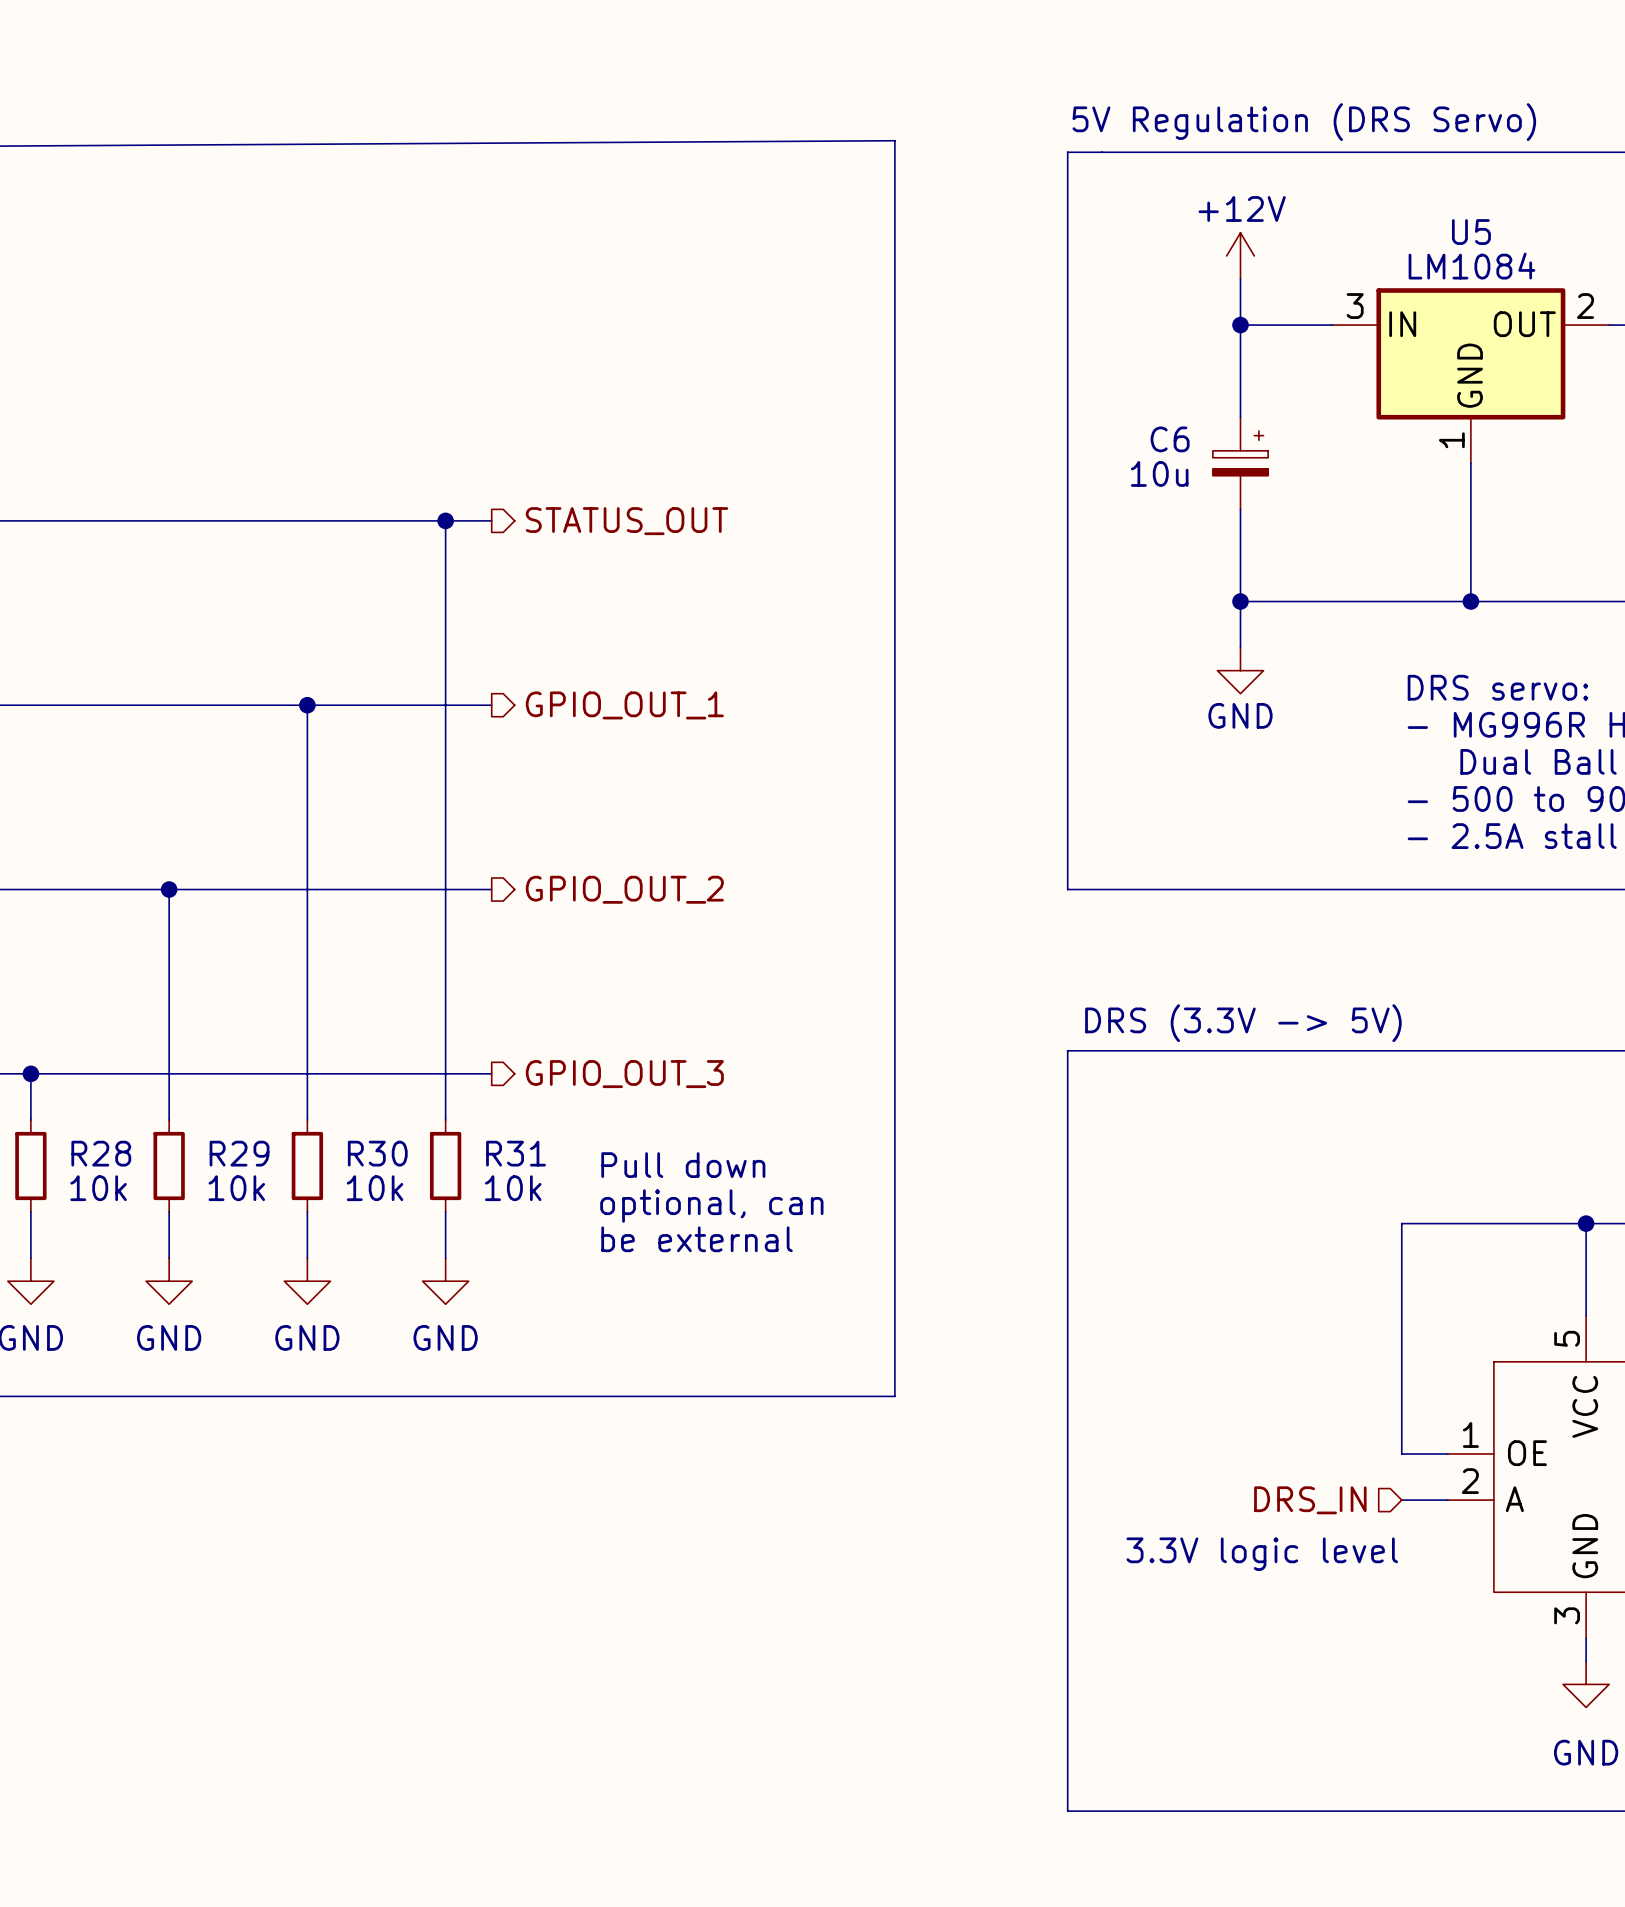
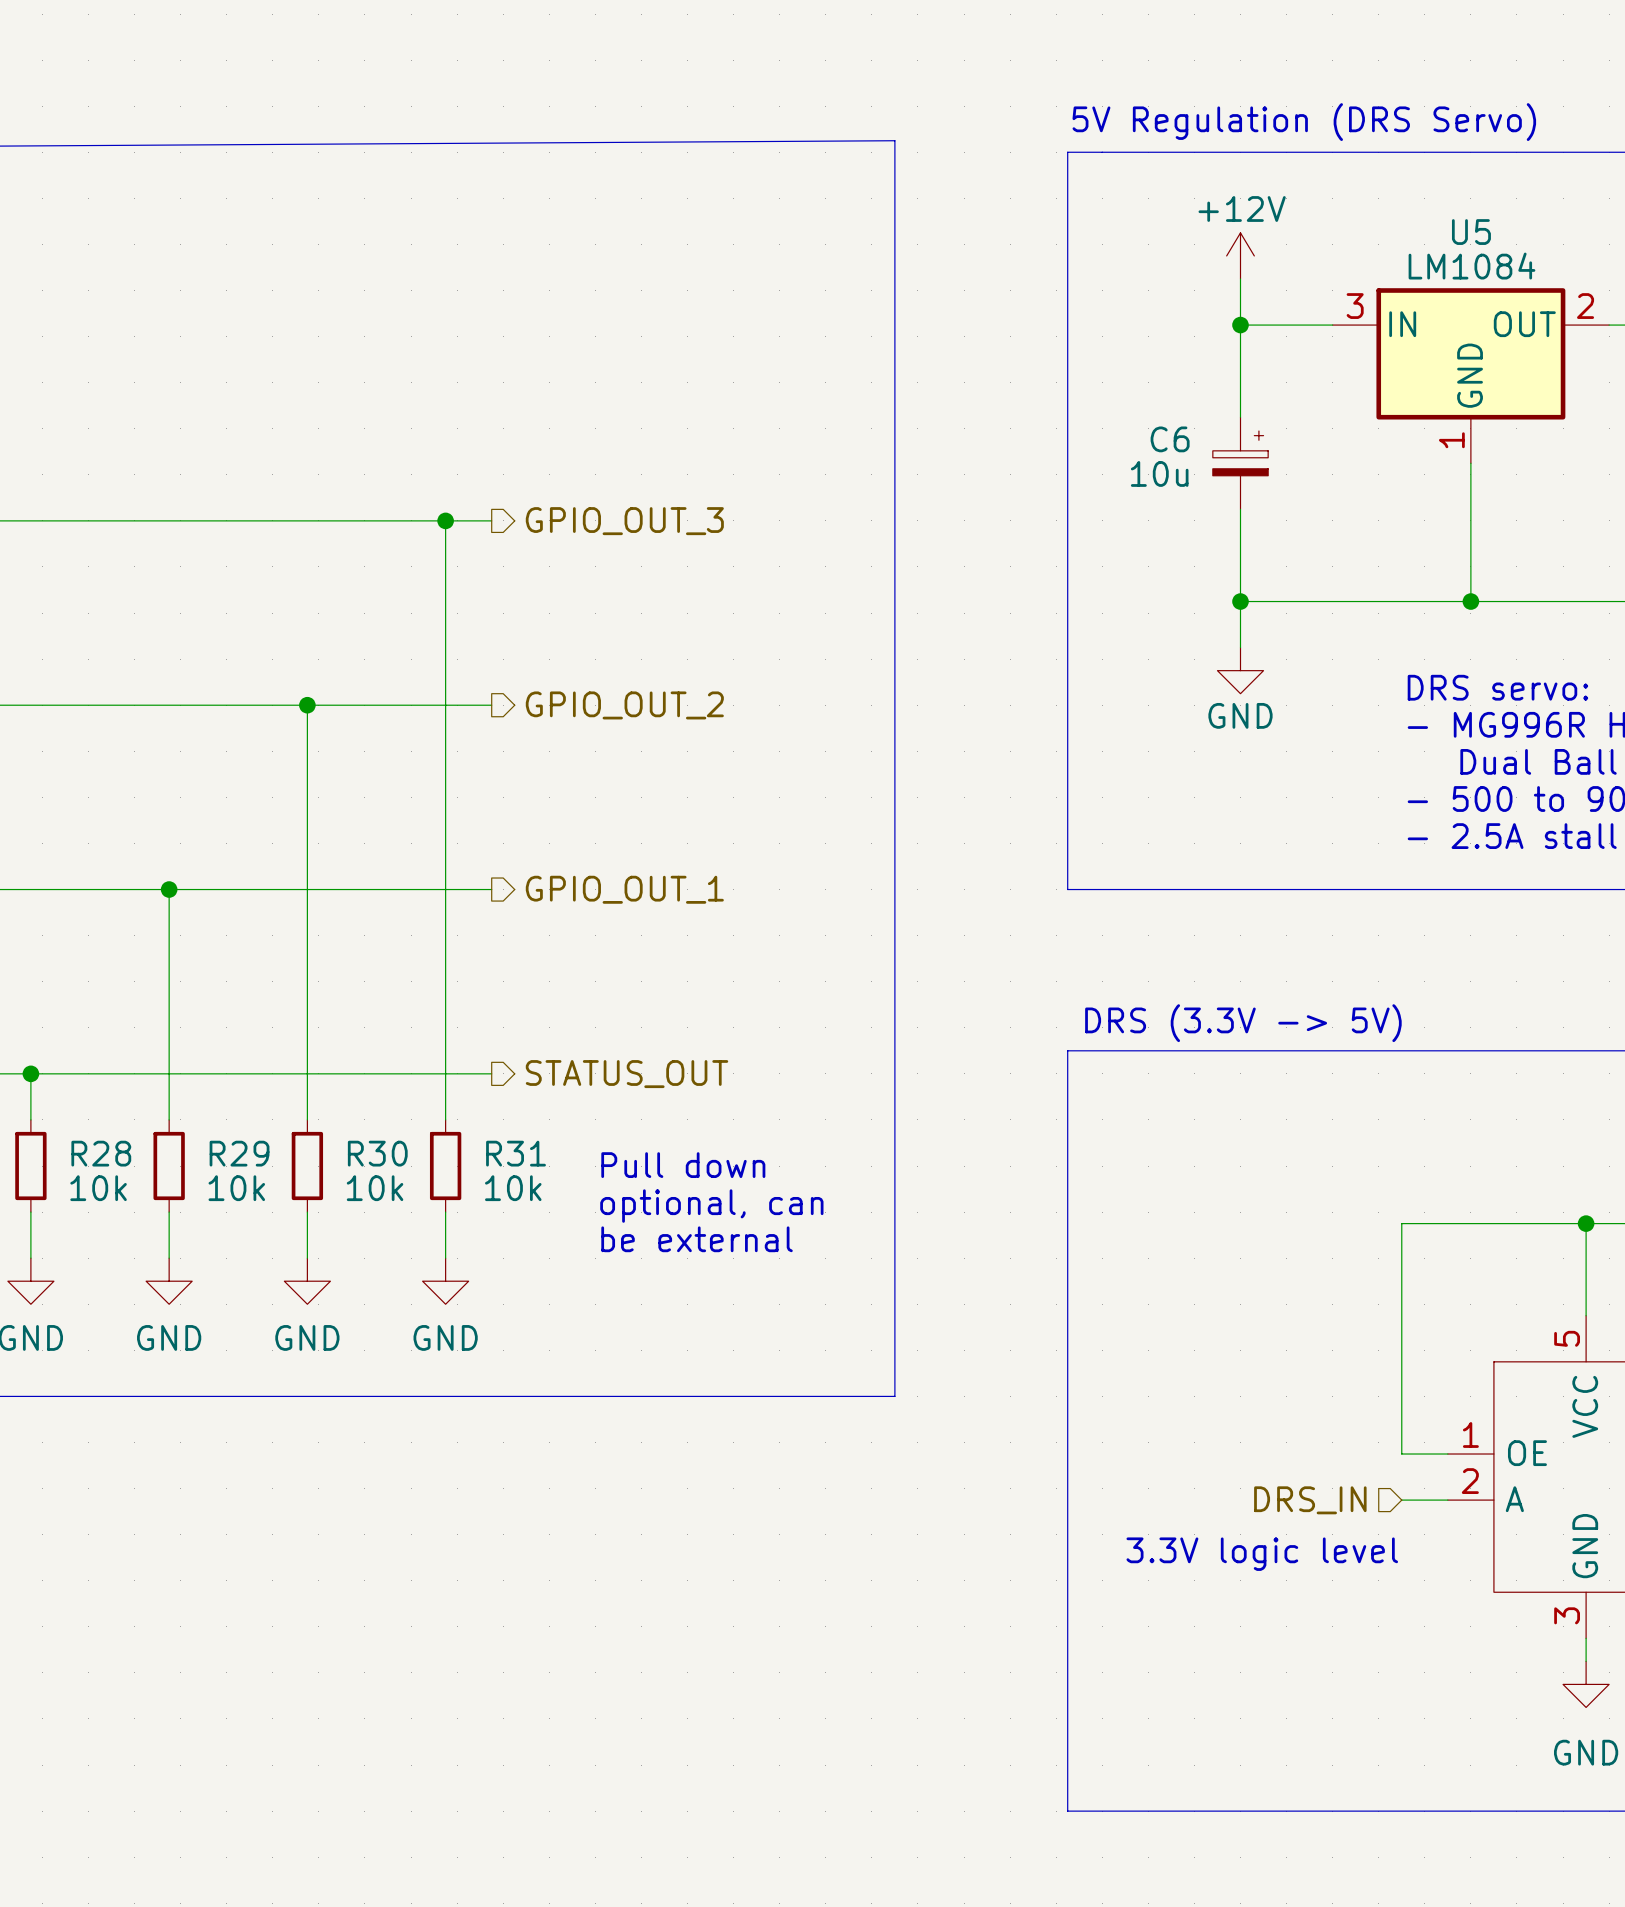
hierarchical label: STATUS_OUT (627, 521) -> GPIO_OUT_3 (624, 521)
hierarchical label: GPIO_OUT_1 (624, 705) -> GPIO_OUT_2 (624, 705)
hierarchical label: GPIO_OUT_2 (624, 889) -> GPIO_OUT_1 (624, 889)
hierarchical label: GPIO_OUT_3 (624, 1074) -> STATUS_OUT (627, 1074)

